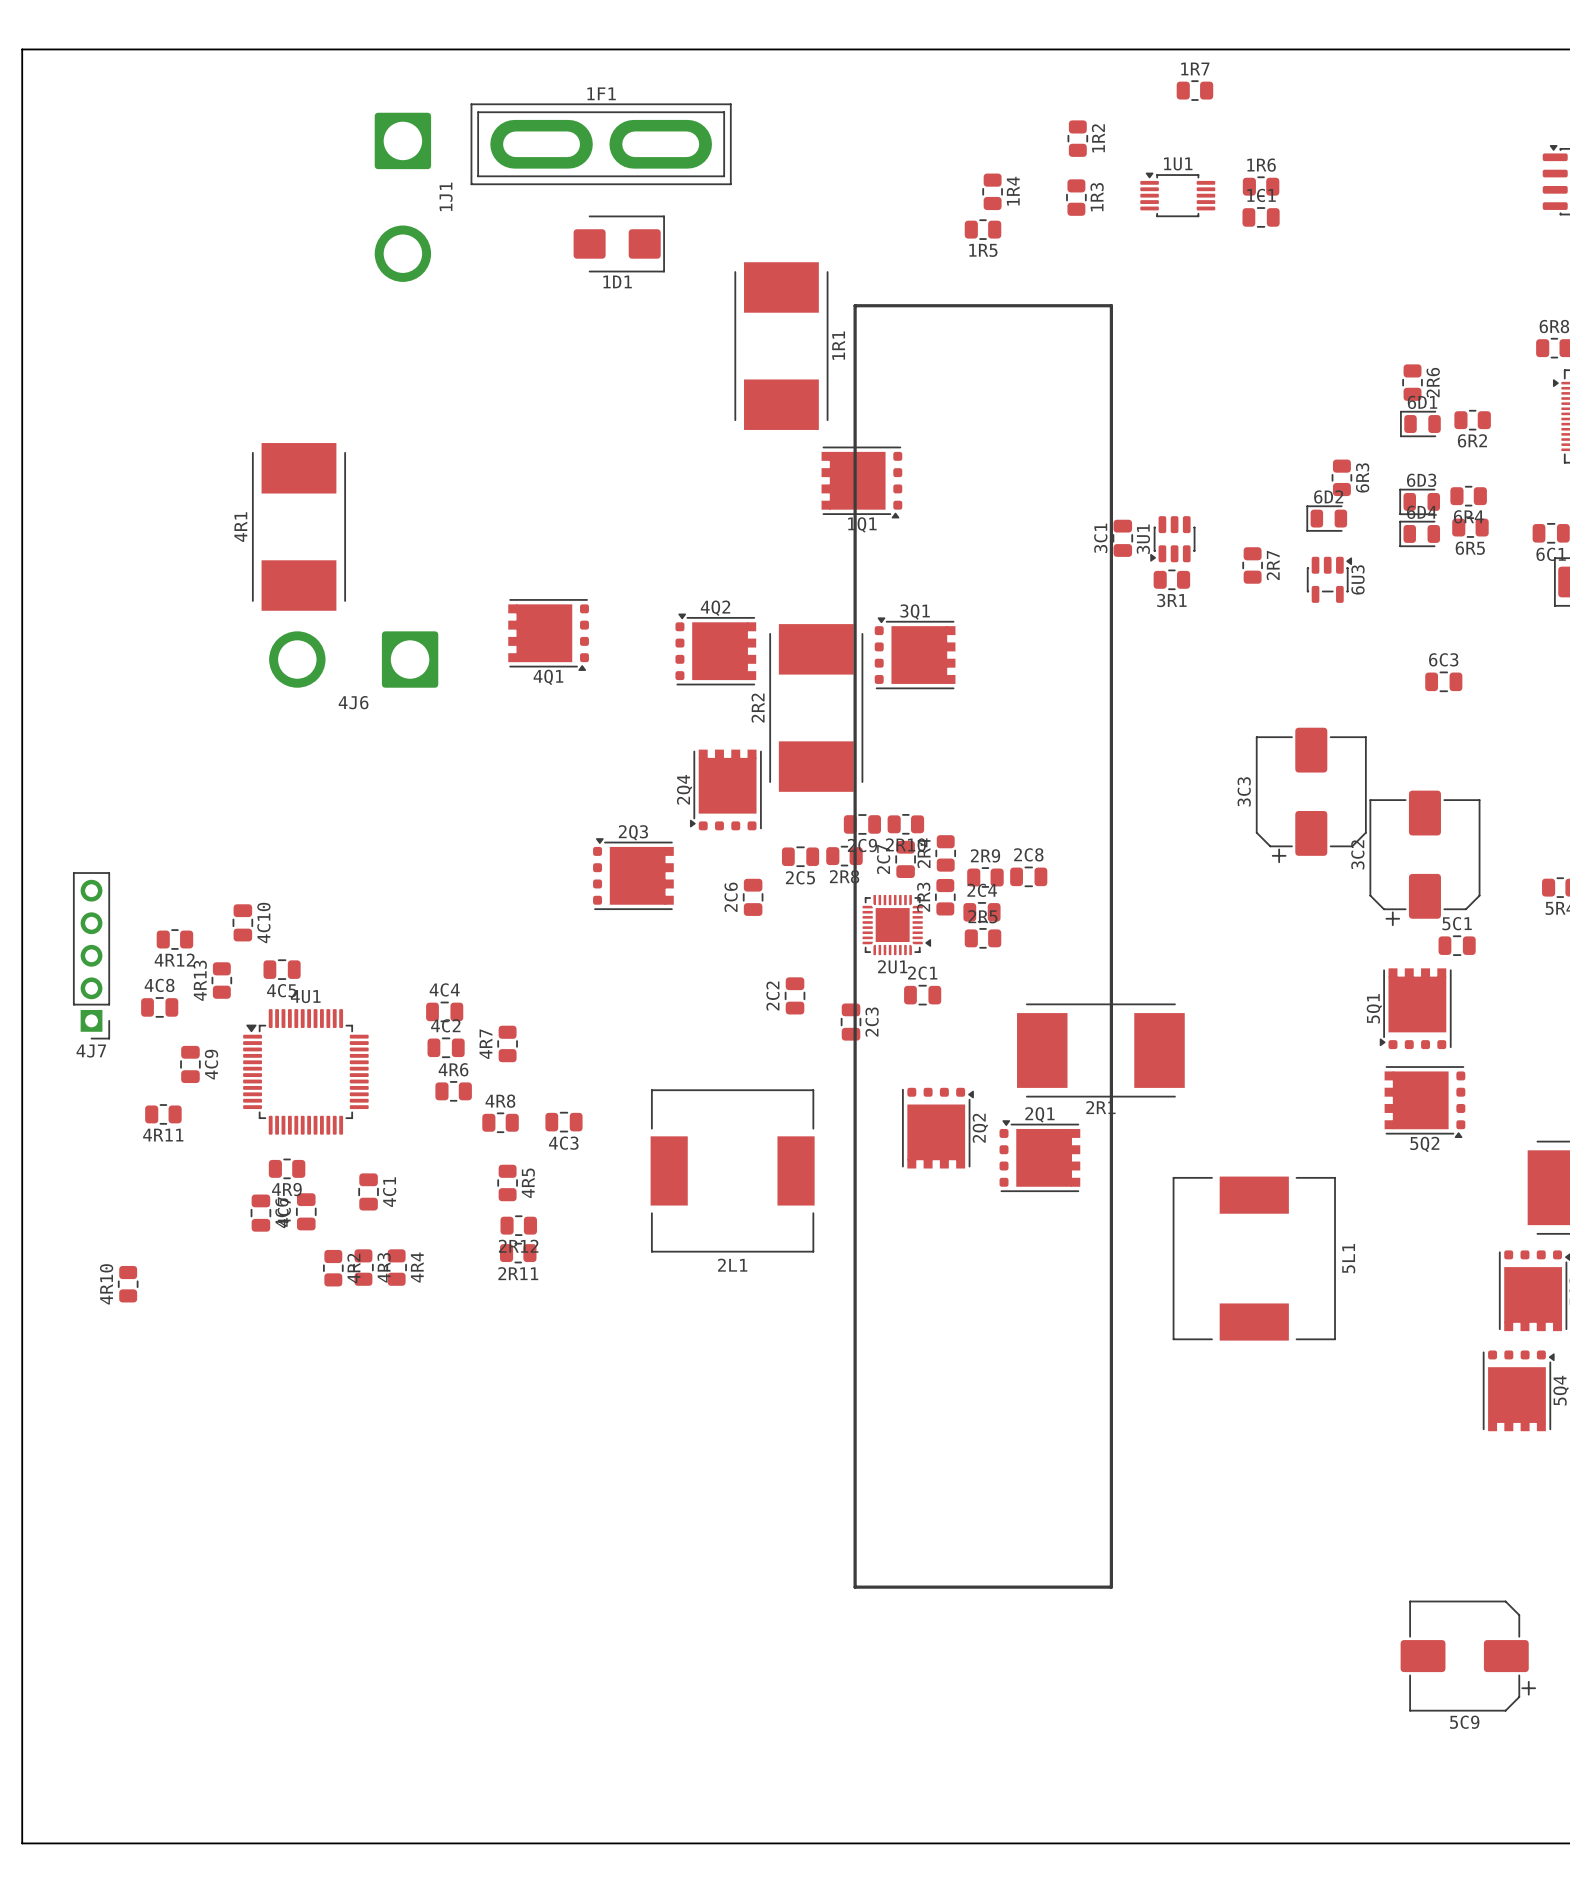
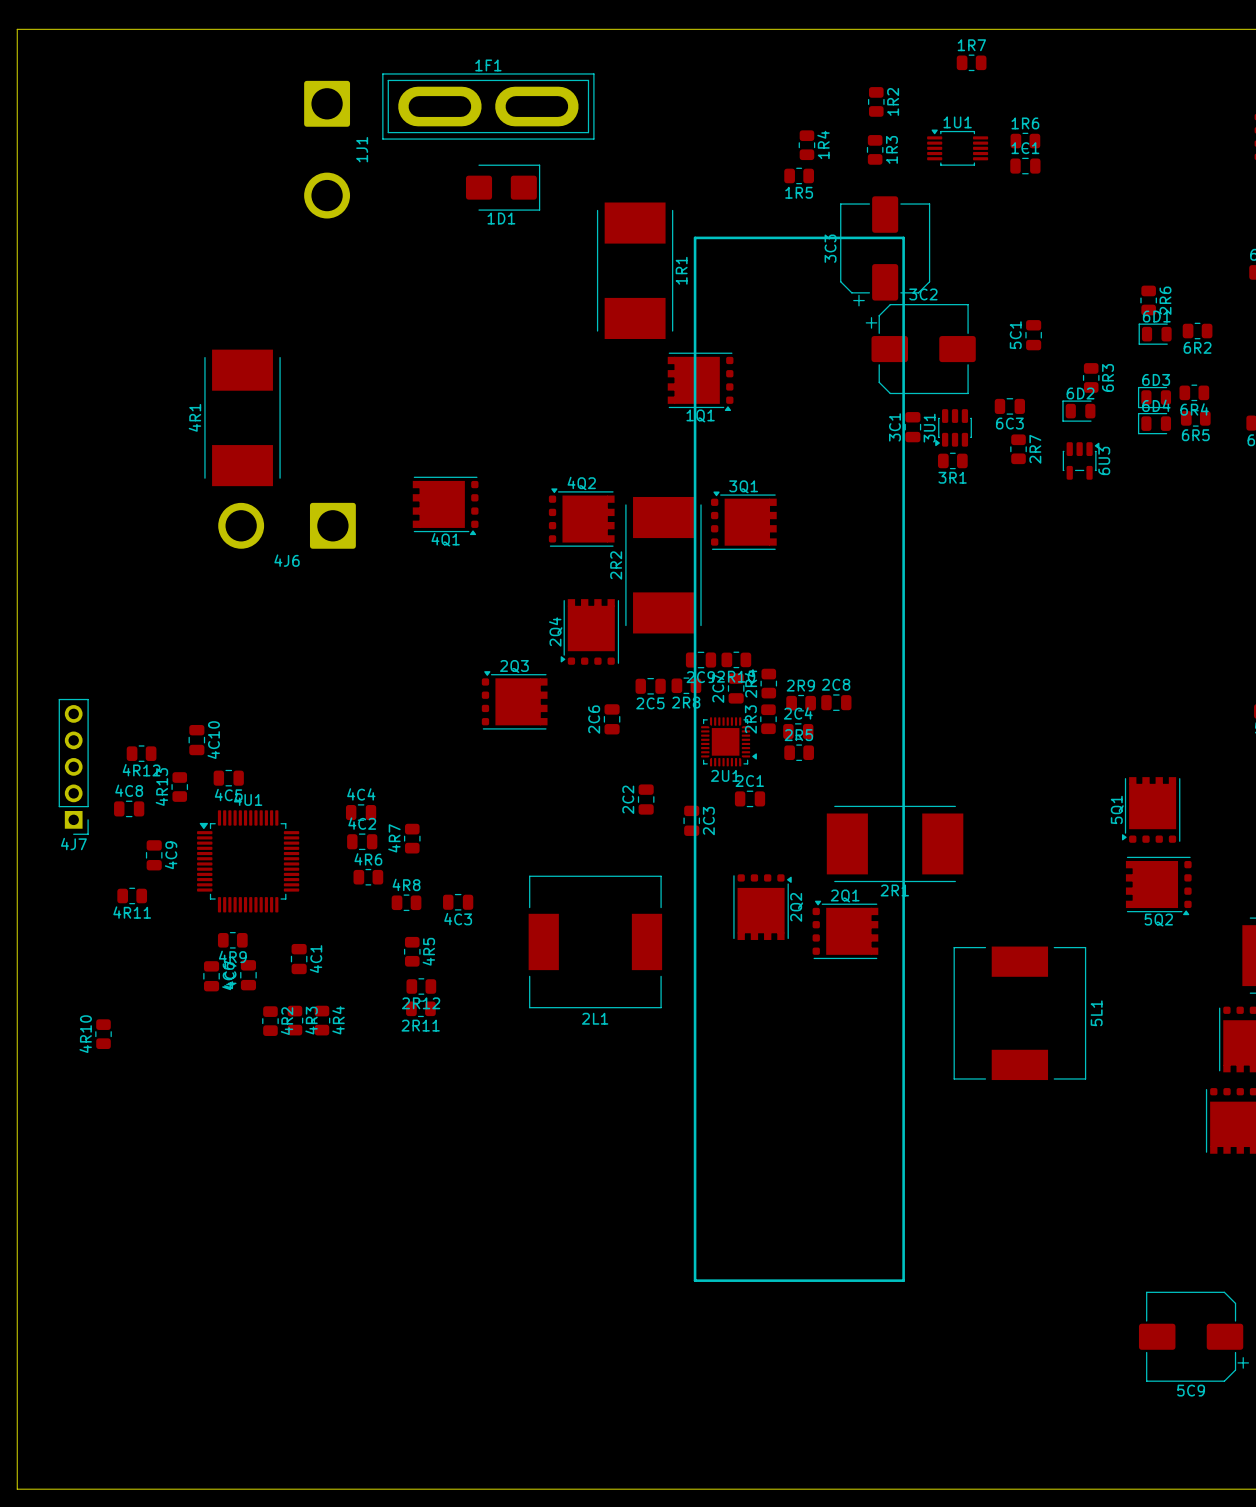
6C3 name position: 6C3 (1443, 659) -> 6C3 (1009, 423)
6C3 position: (1443, 681) -> (1009, 406)
3C3 position: (1311, 795) -> (885, 251)
3C2 rotation: 0° (1424, 858) -> 90° clockwise (920, 349)
3C2 position: (1424, 858) -> (920, 349)
5C1 name position: 5C1 (1457, 923) -> 5C1 (1015, 335)
5C1 rotation: 0° (1457, 945) -> 90° clockwise (1033, 335)
5C1 position: (1457, 945) -> (1033, 335)

